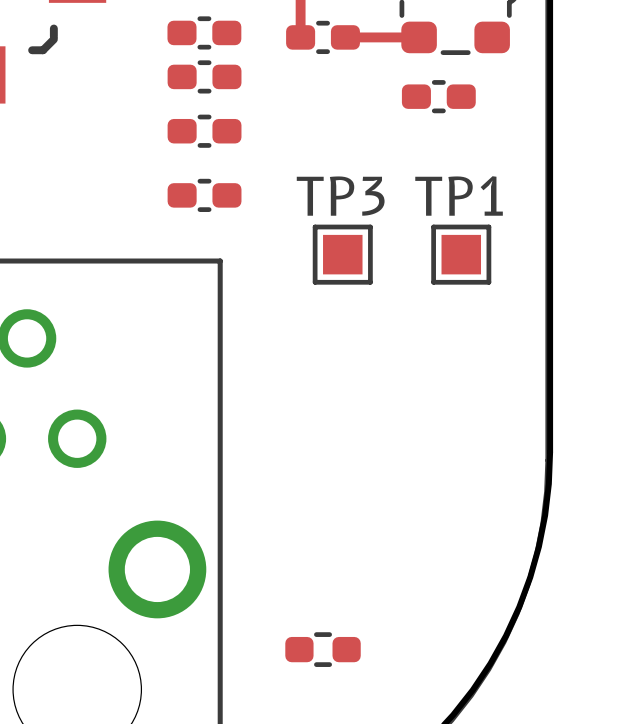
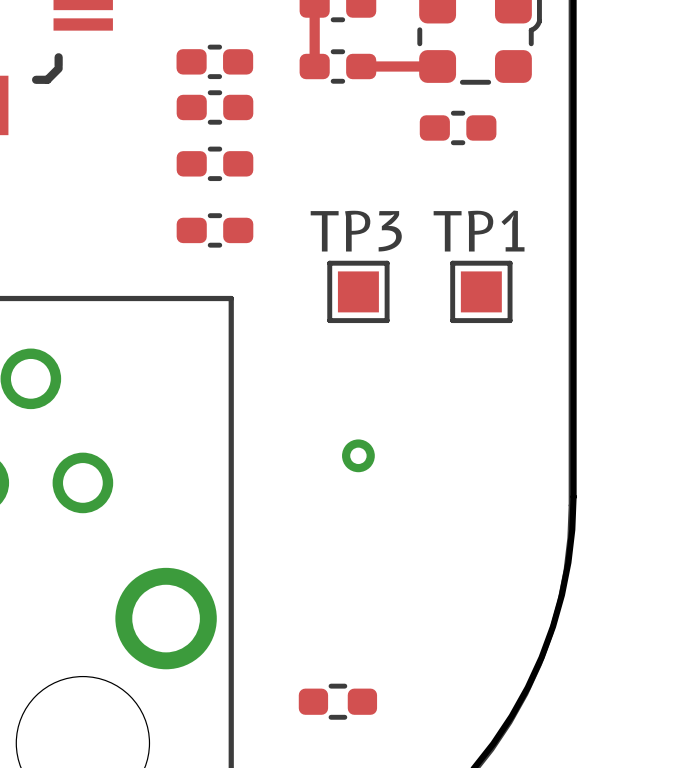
via: none -> (358, 455)

